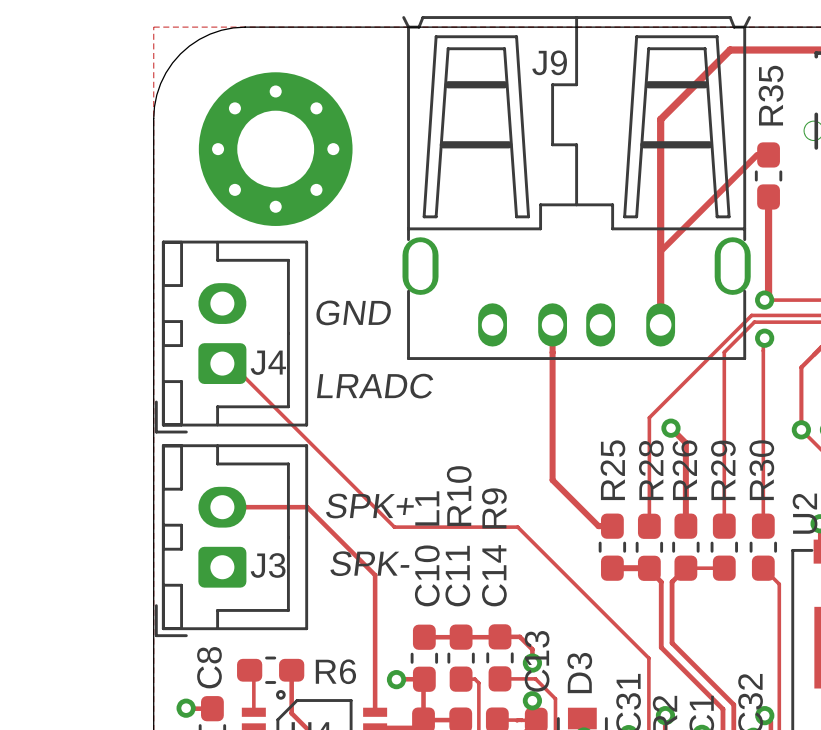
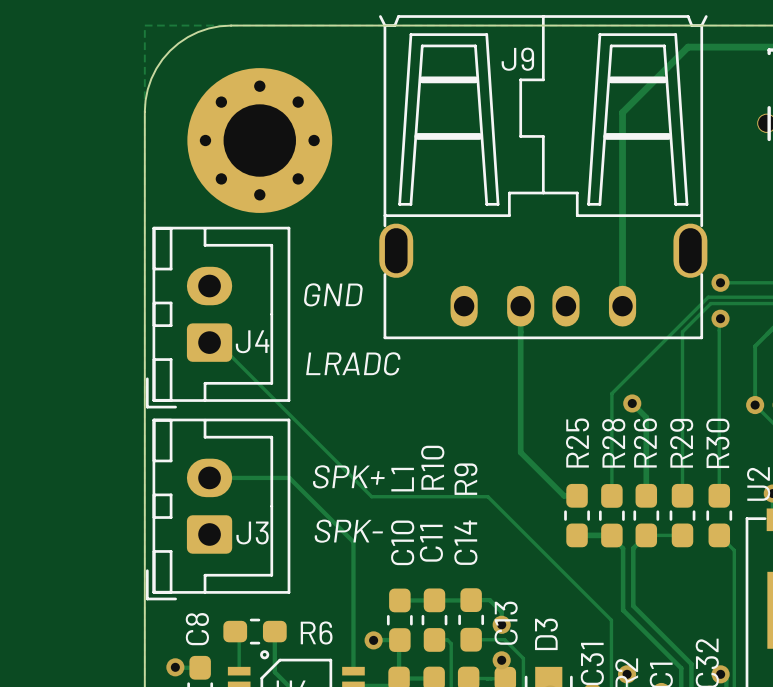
track: (768, 154) (757, 154) (660, 251) (660, 324) -> none
R35: (768, 175) -> none
track: (768, 196) (768, 296) (764, 300) -> none

